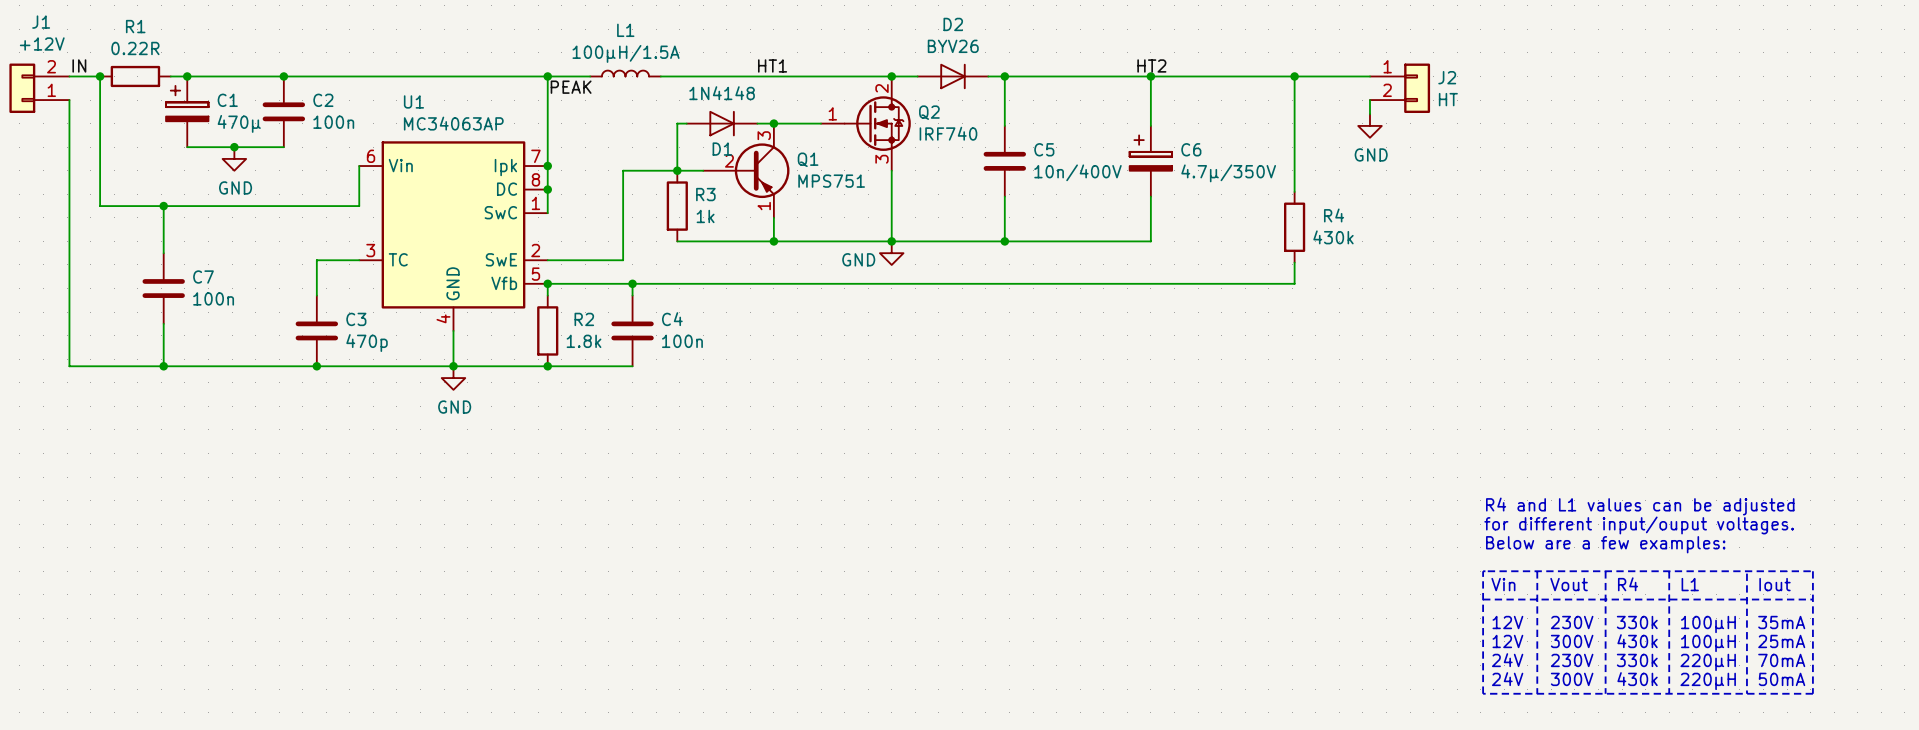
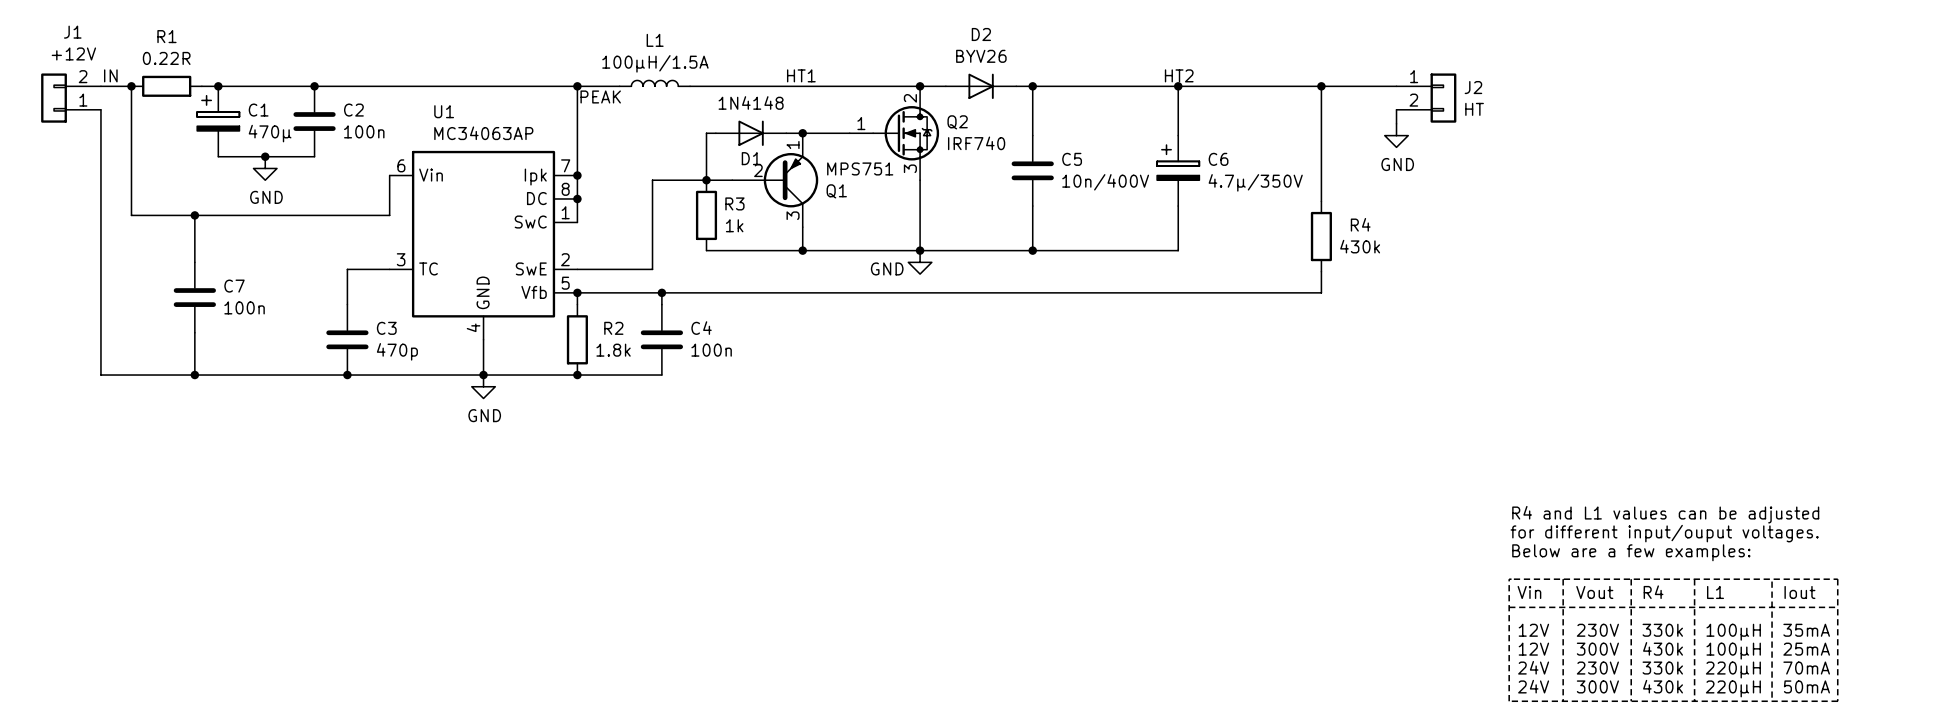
Q1 flip: as is (762, 170) -> up-down (790, 180)

